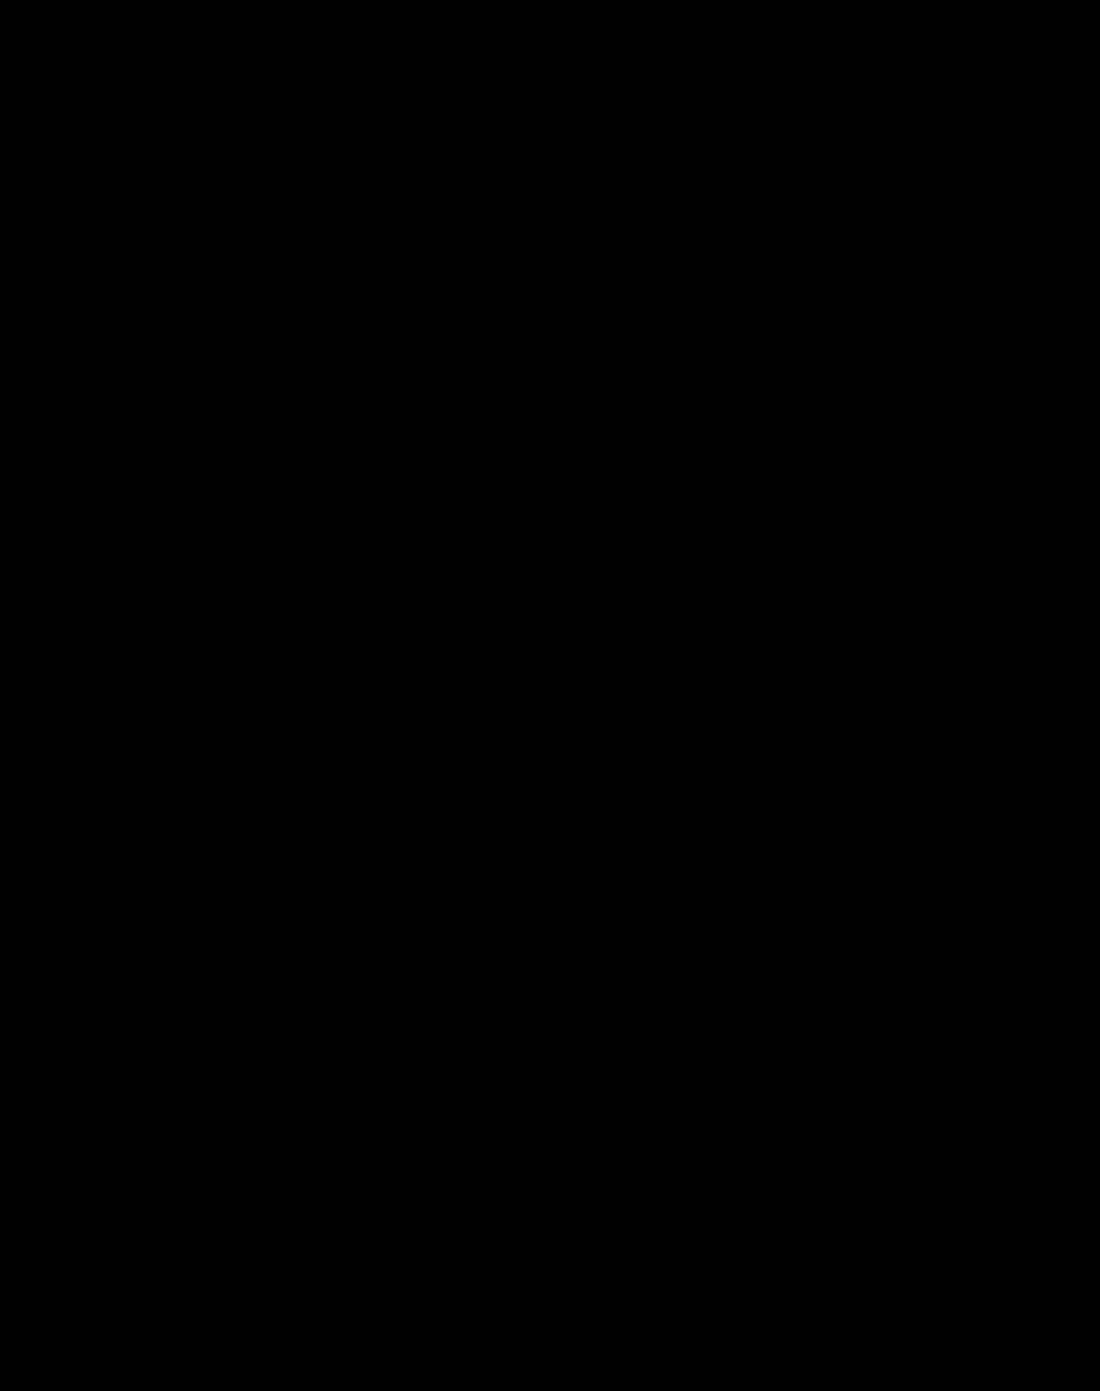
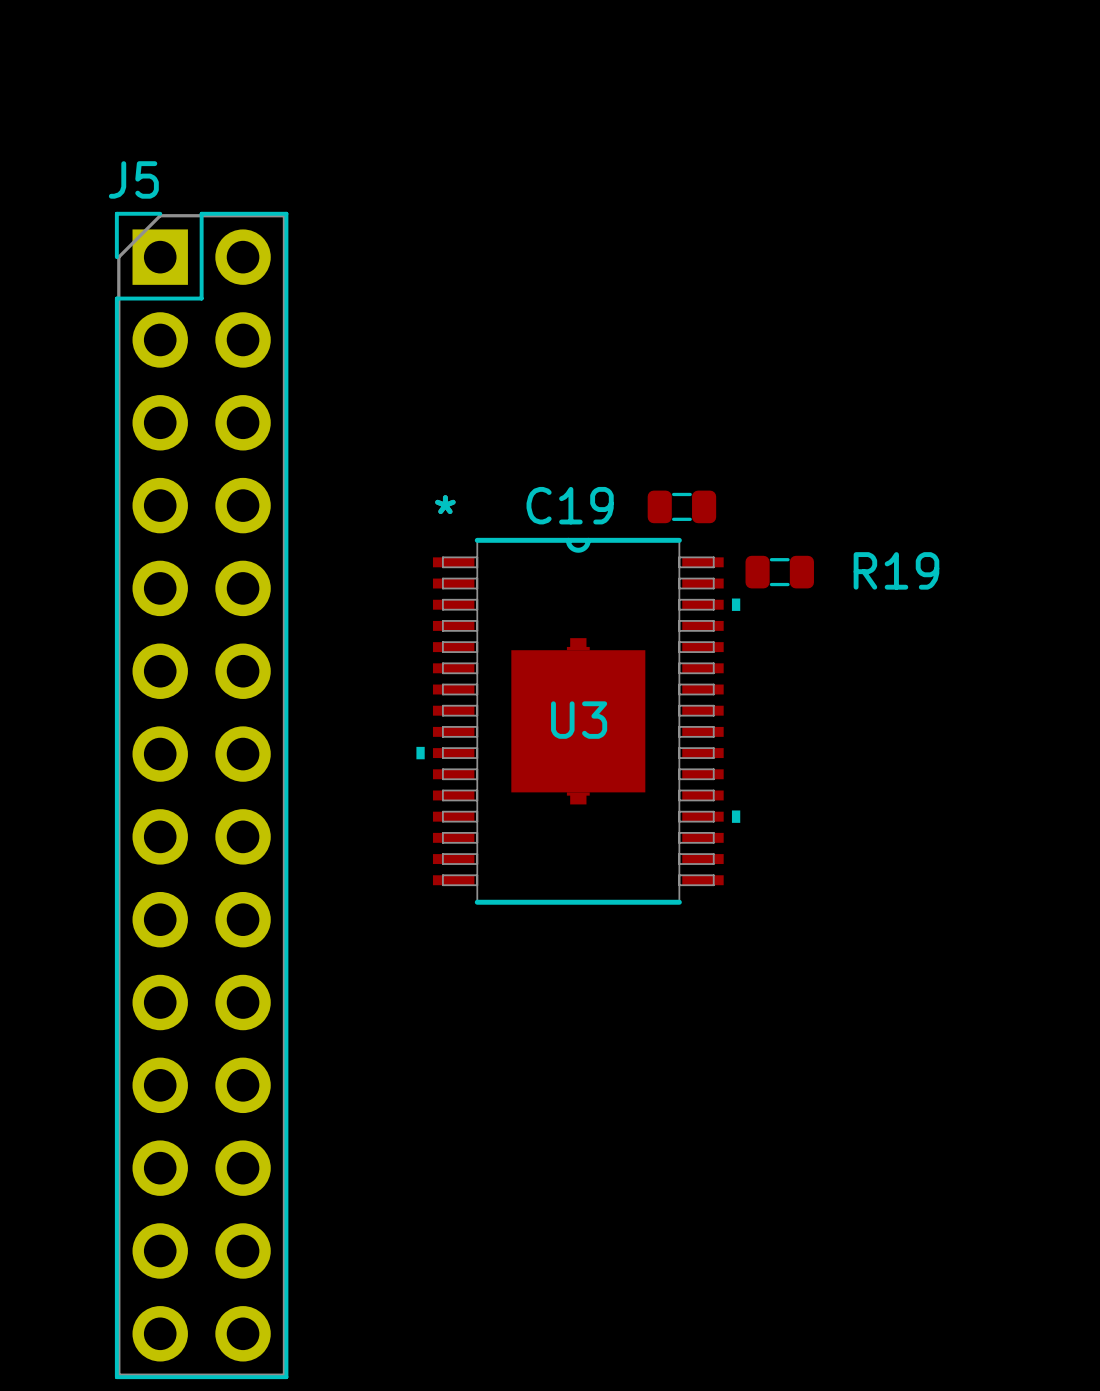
C19: none -> (681, 506)
R19: none -> (779, 572)
U3: none -> (578, 721)
J5: none -> (201, 795)

